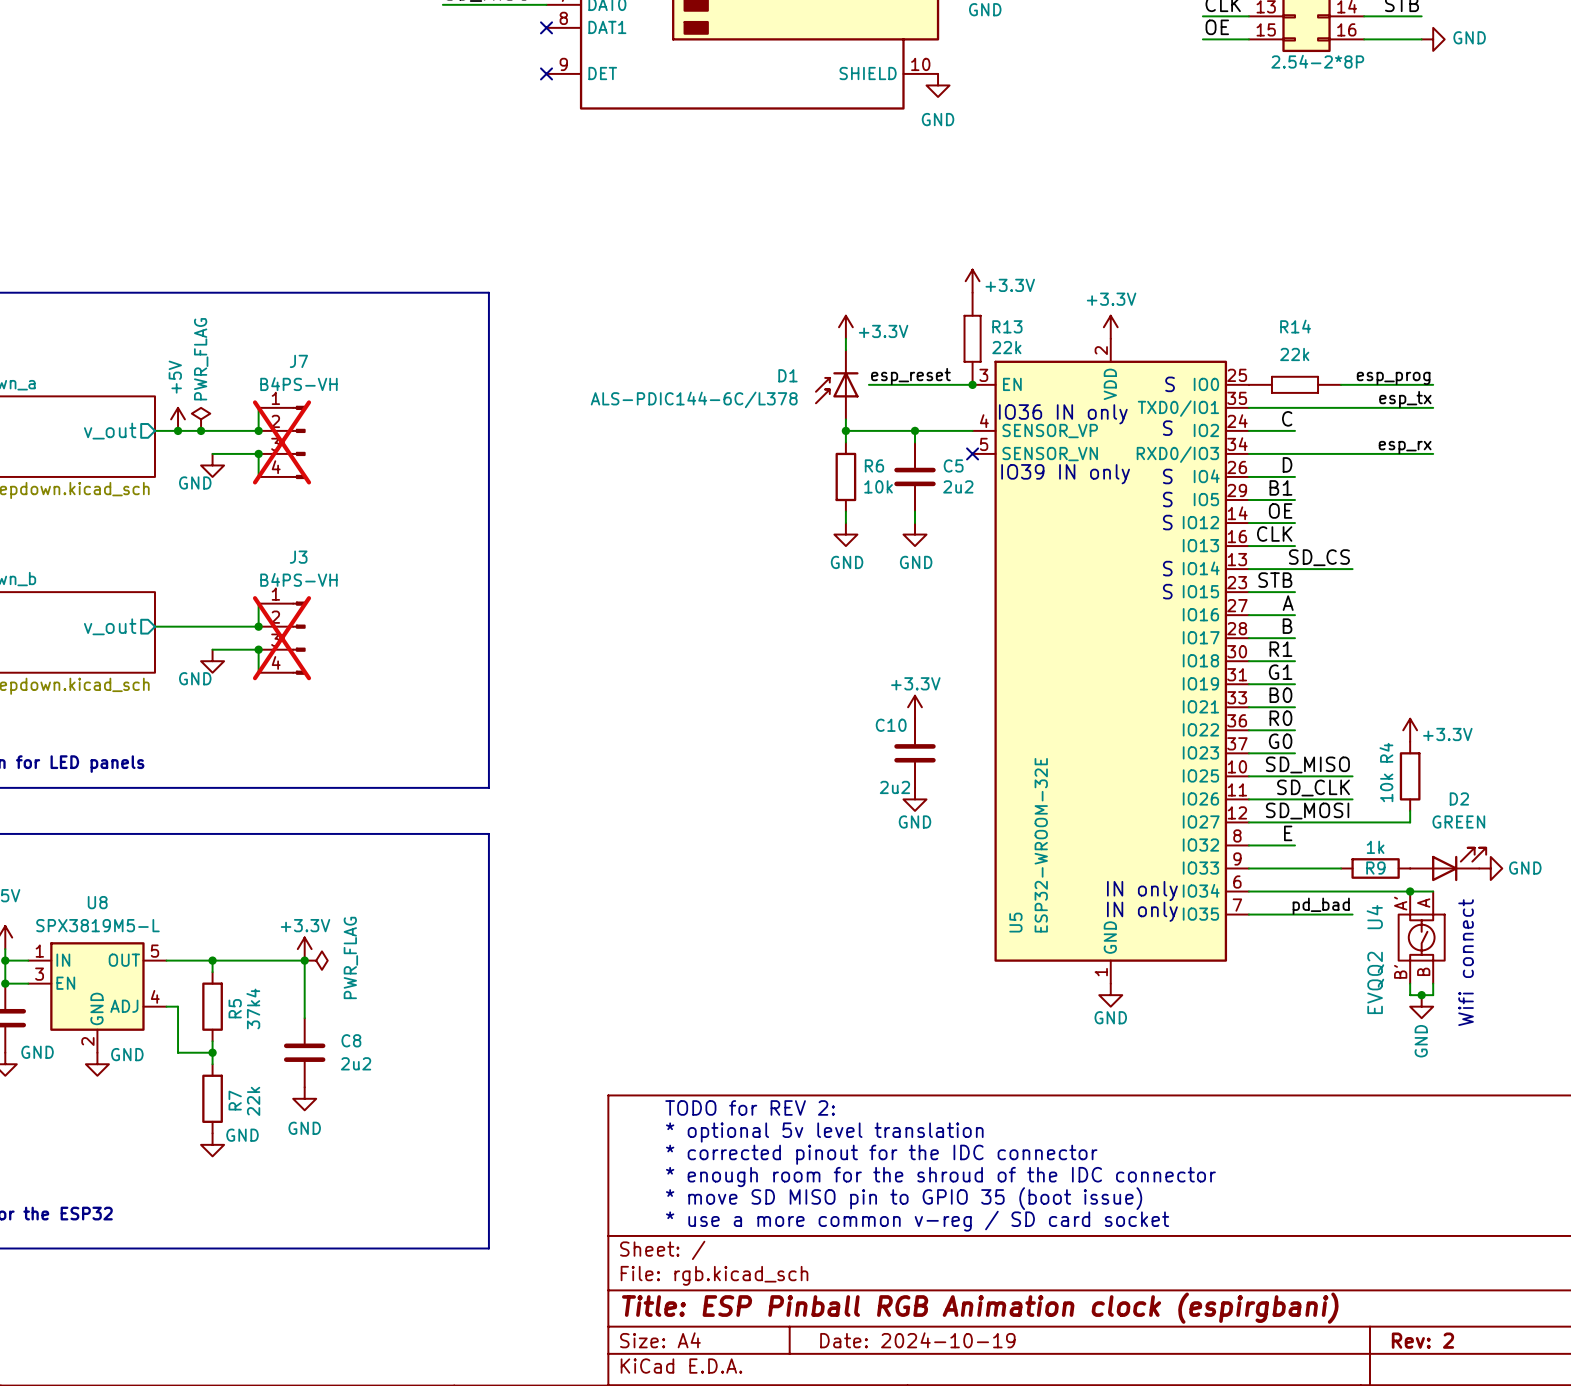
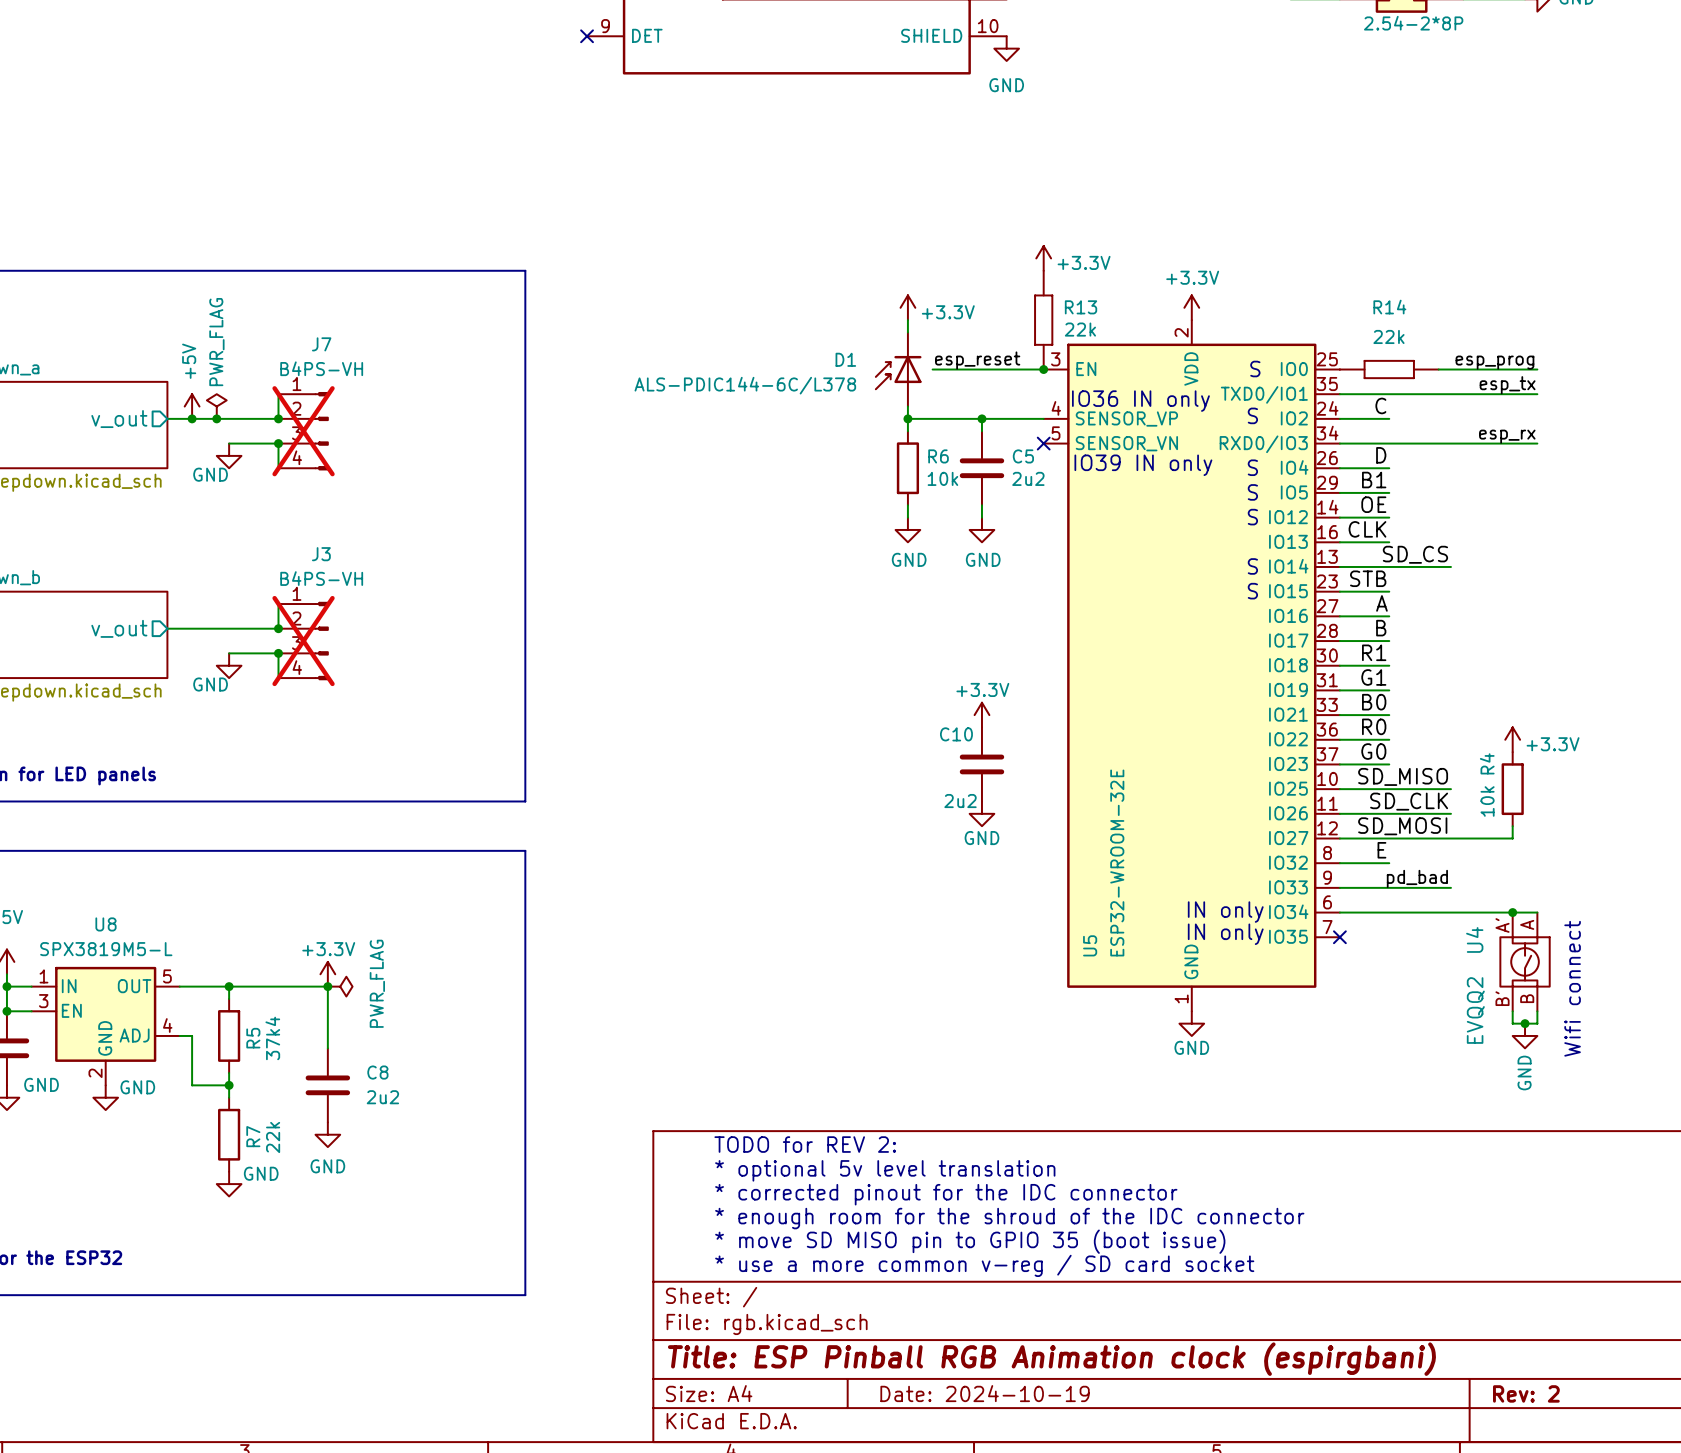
D2: GREEN (1448, 864) -> none
R9: 1k (1375, 868) -> none
power symbol: GND (1490, 868) -> none
label position: pd_bad (1321, 906) -> pd_bad (1417, 878)
wire: (1248, 914) (1352, 914) -> none
no-connect mark: none -> (1339, 937)

